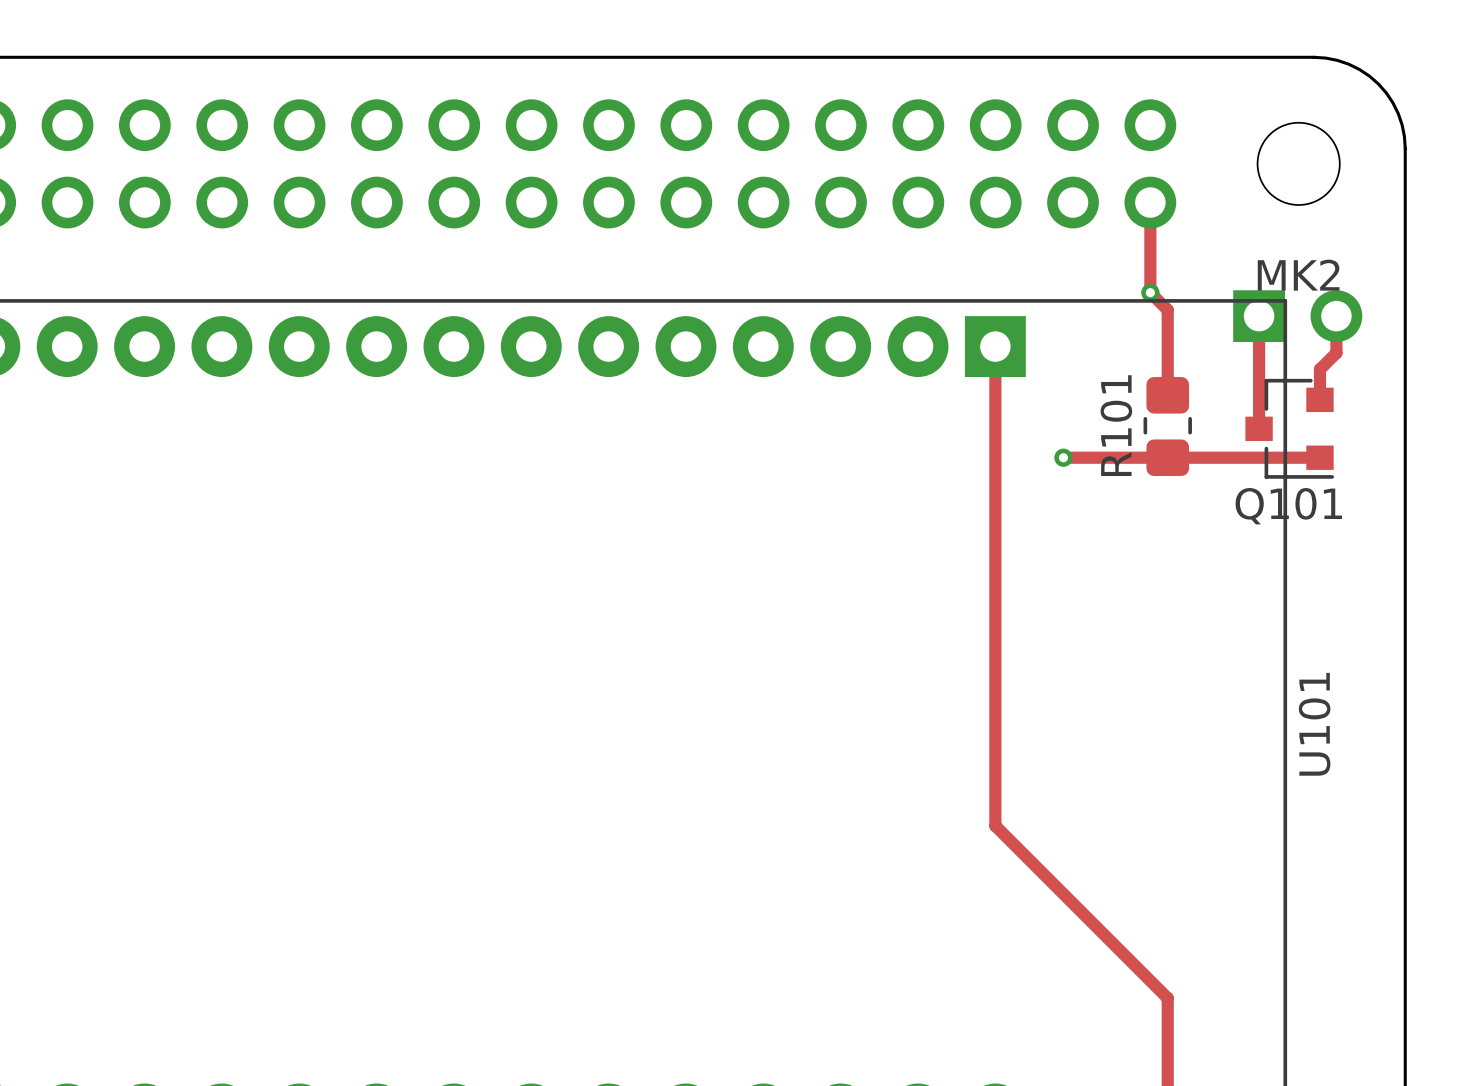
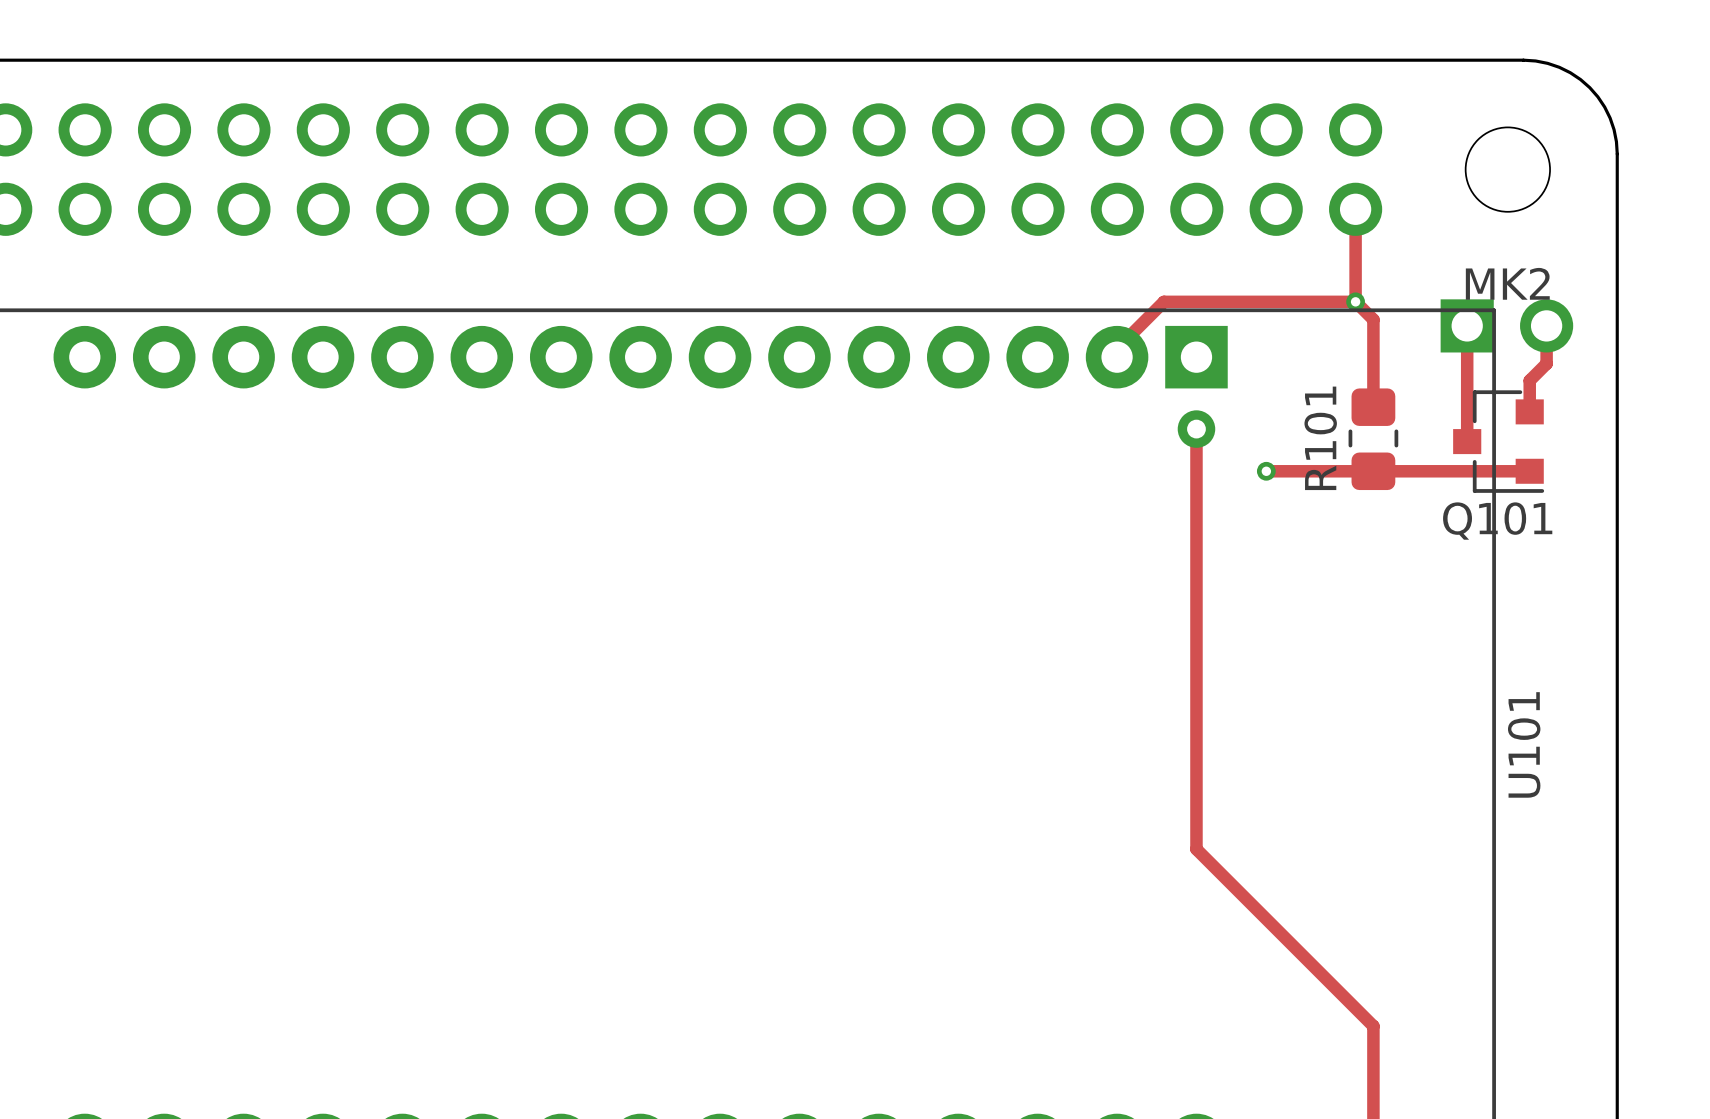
track: none -> (1355, 301) (1163, 301) (1117, 348)
track: (995, 346) (995, 416) -> none
via: none -> (1196, 429)

